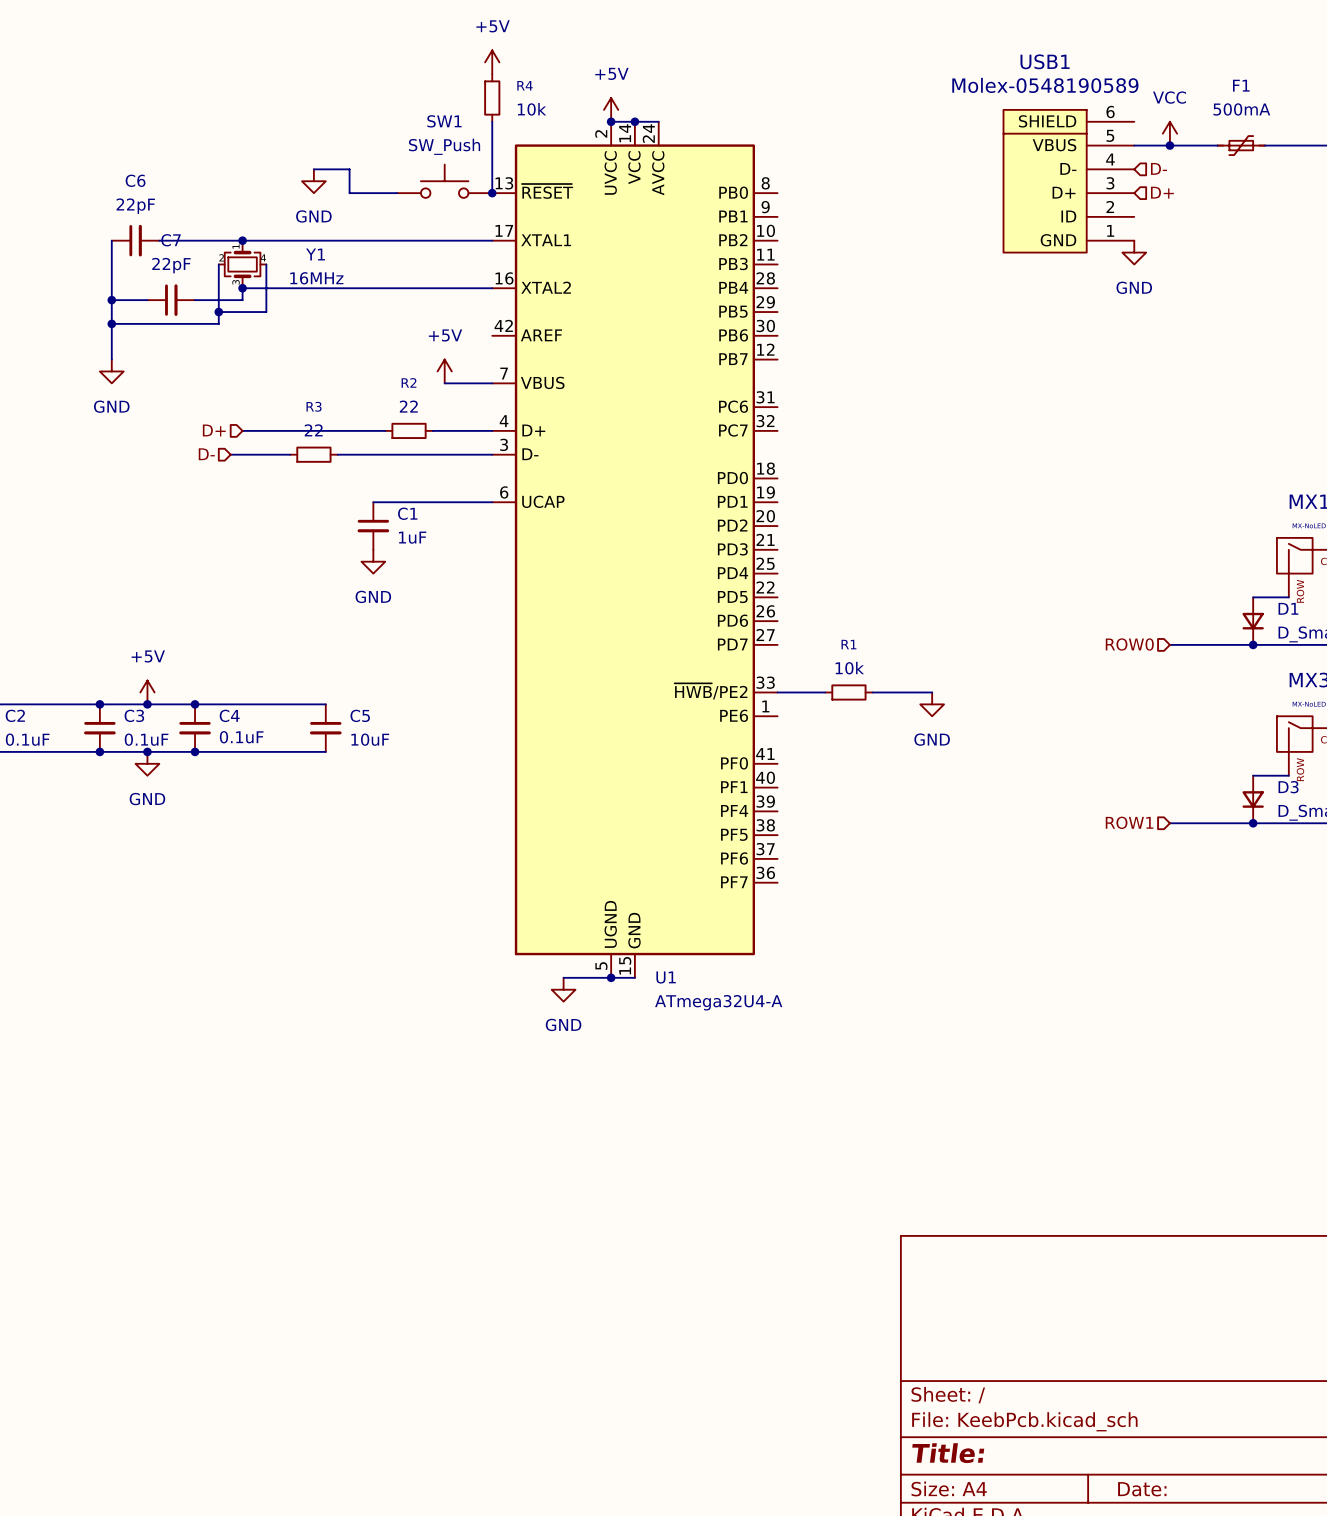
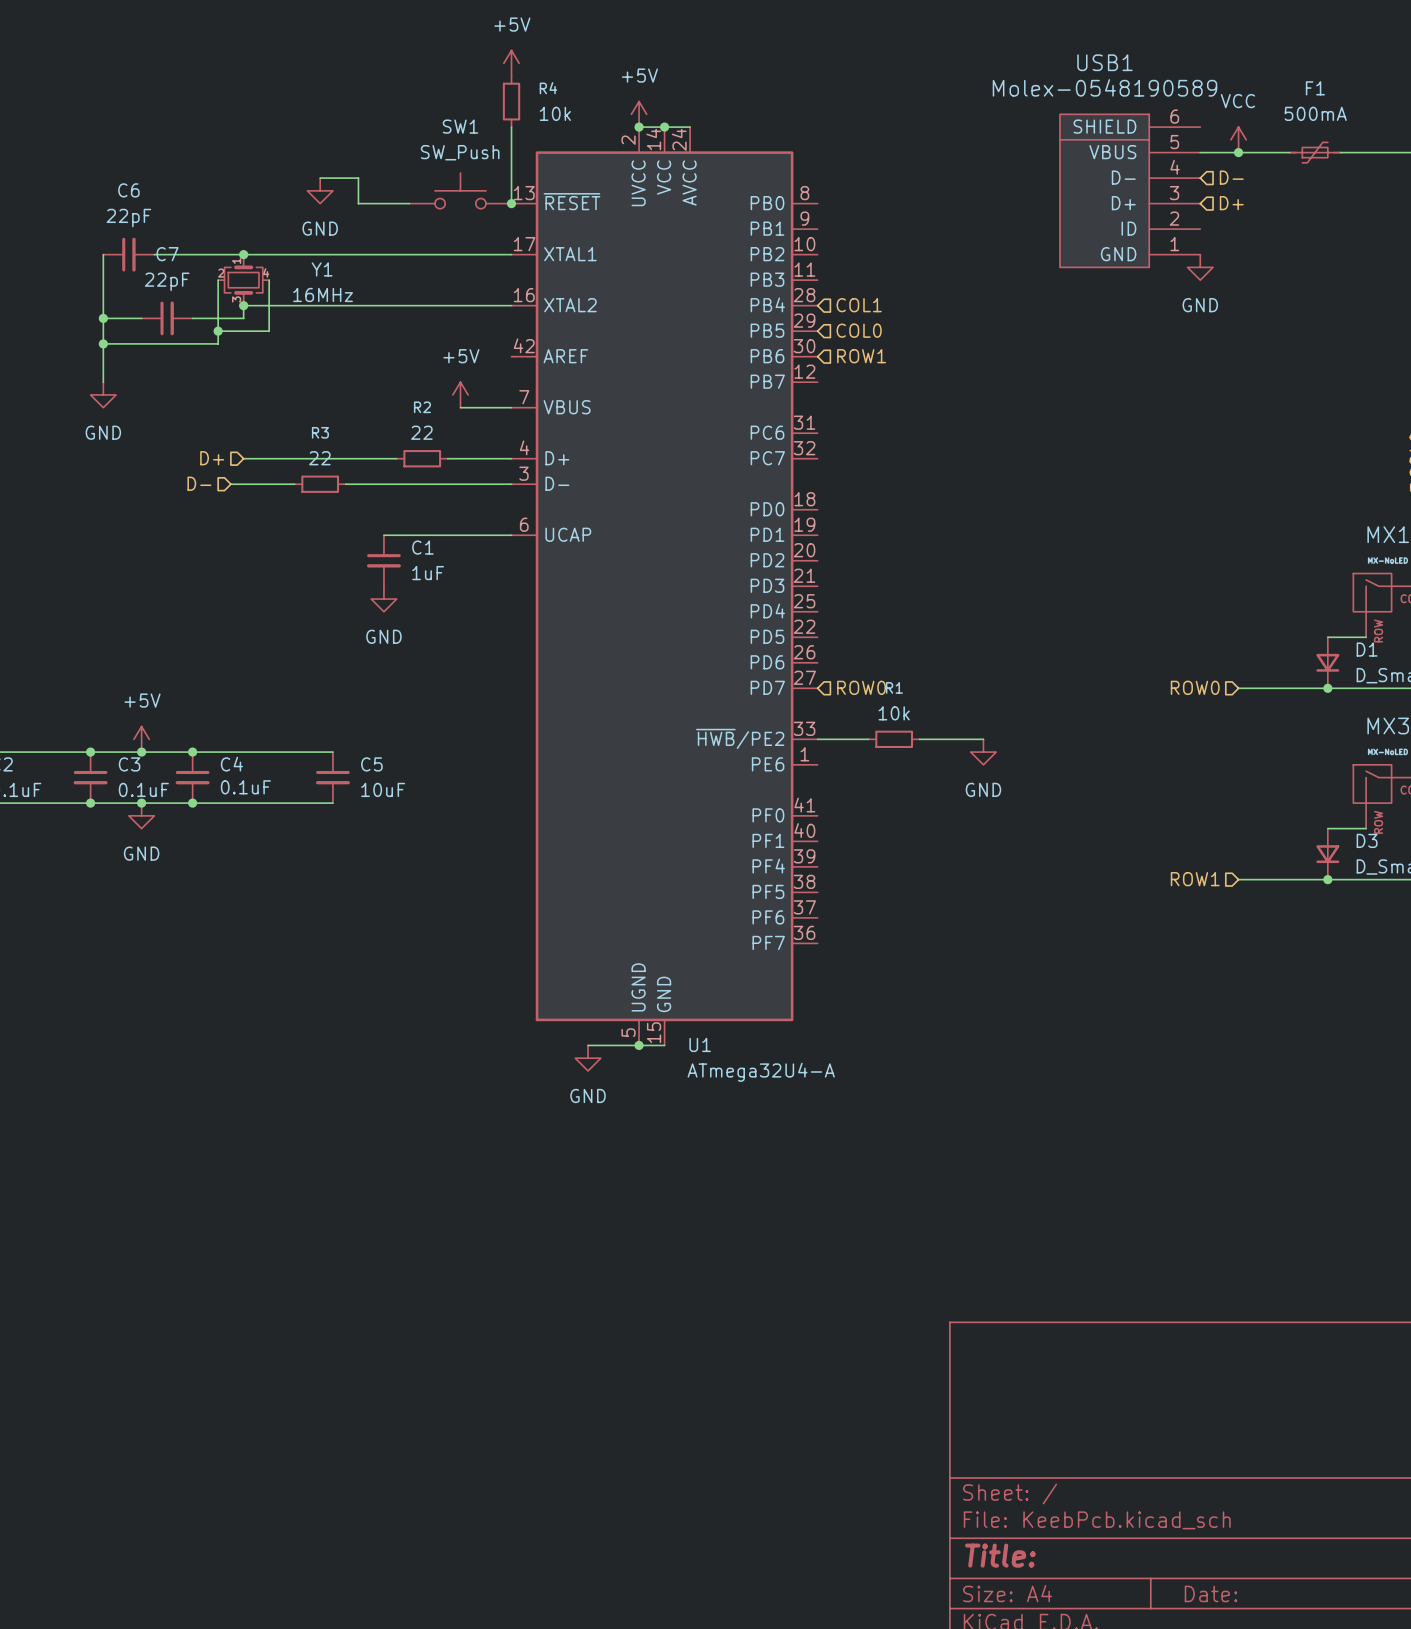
hierarchical label: none -> COL1 (859, 305)
hierarchical label: none -> COL0 (859, 330)
hierarchical label: none -> ROW1 (861, 356)
hierarchical label: none -> ROW0 (861, 687)

